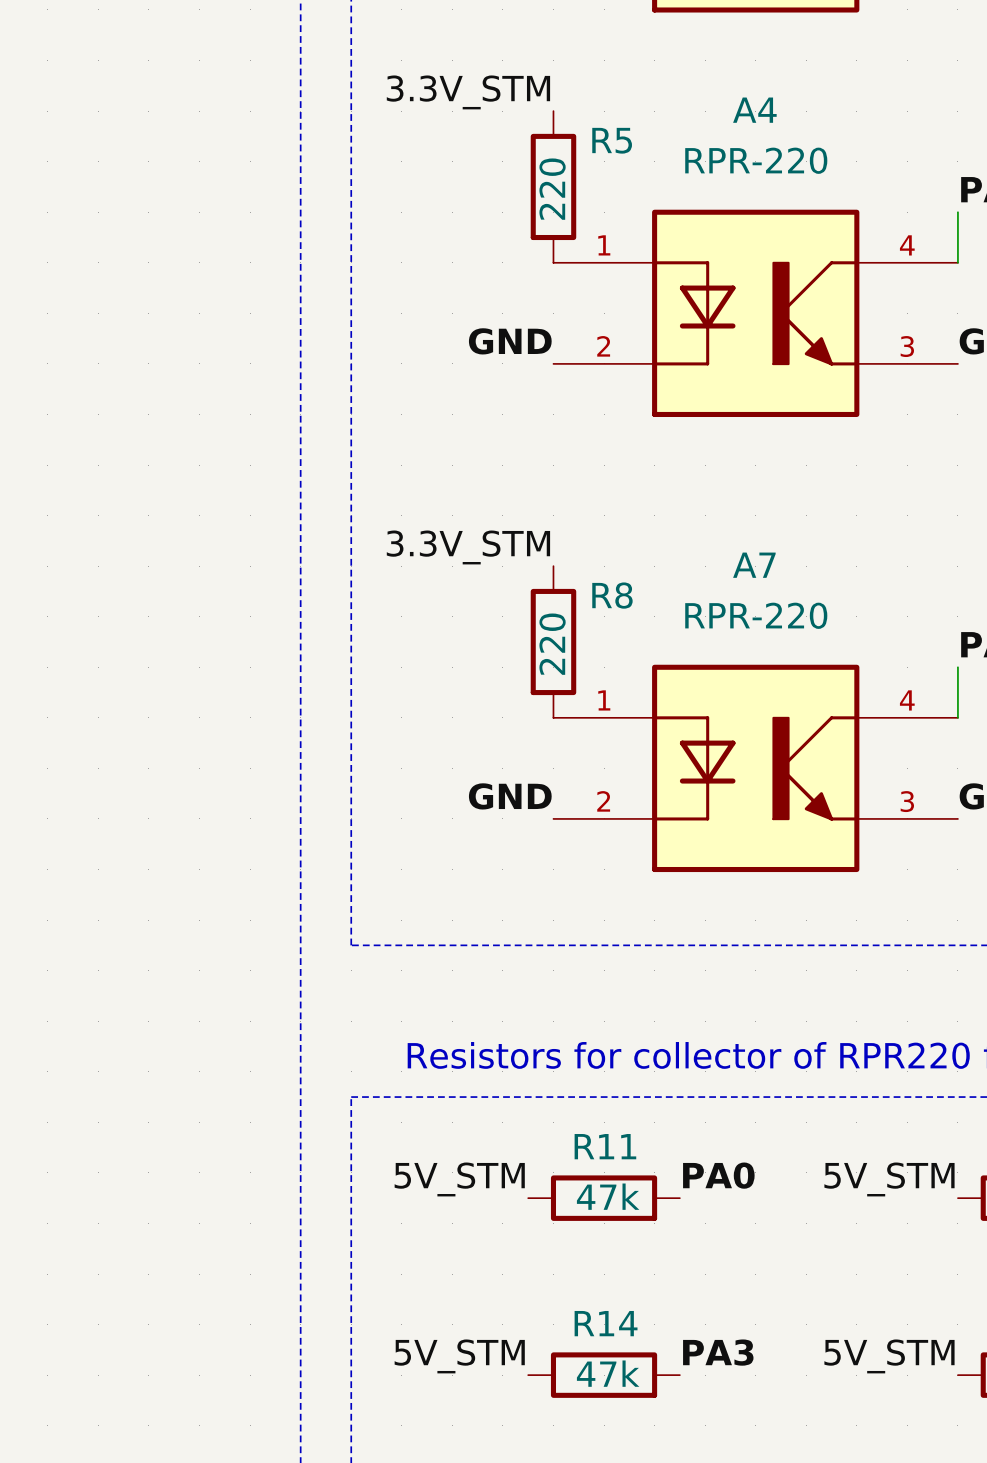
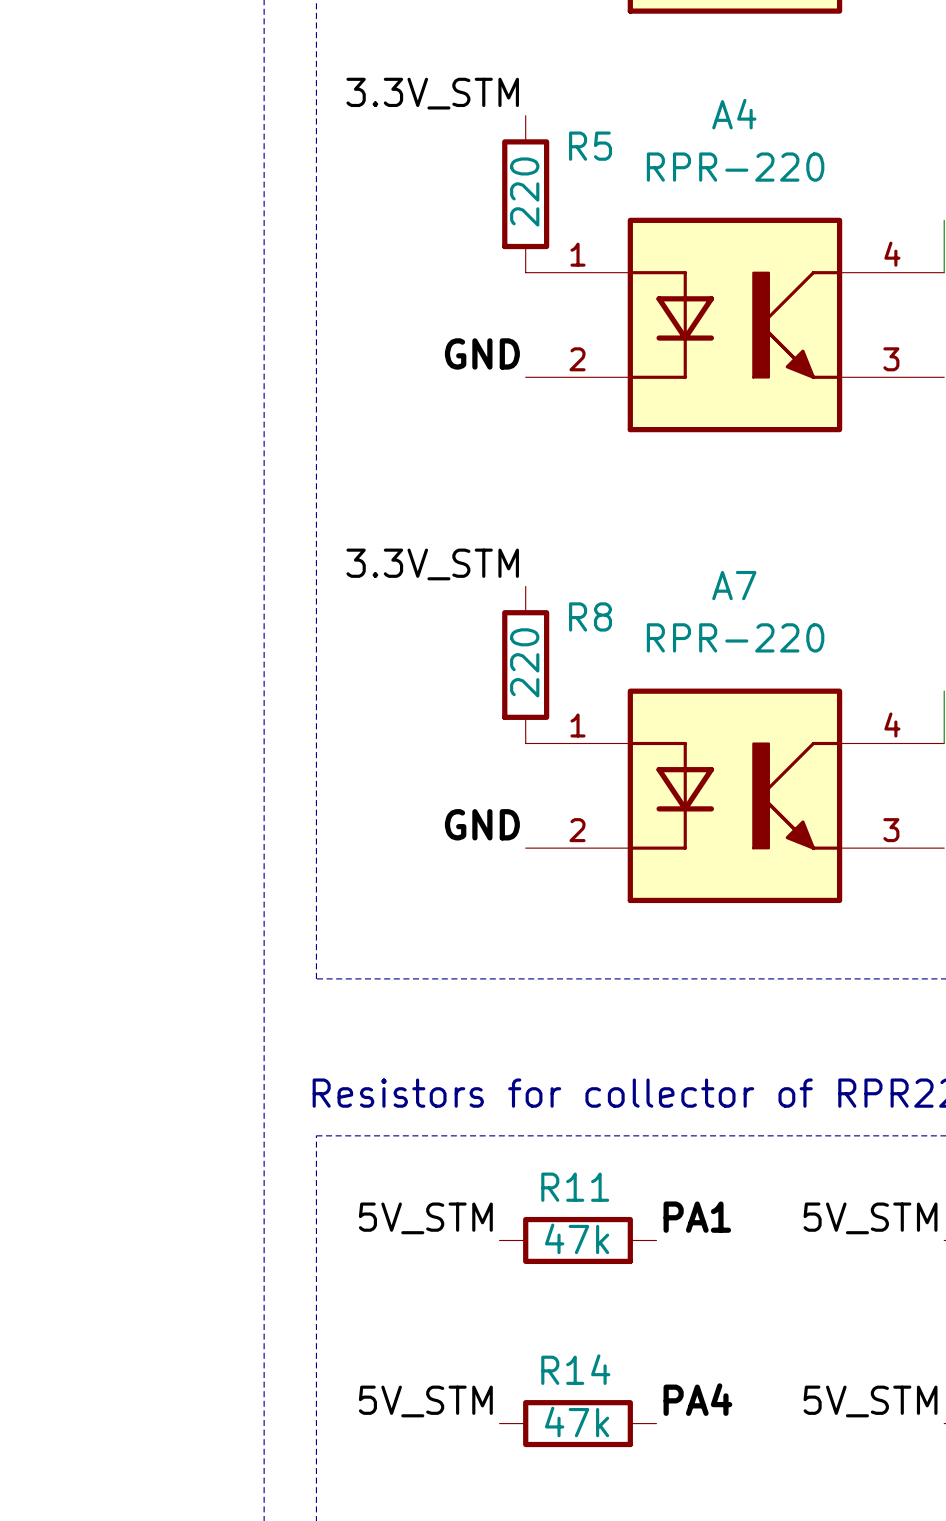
label: PA0 (718, 1175) -> PA1 (697, 1217)
label: PA3 (718, 1352) -> PA4 (697, 1399)

